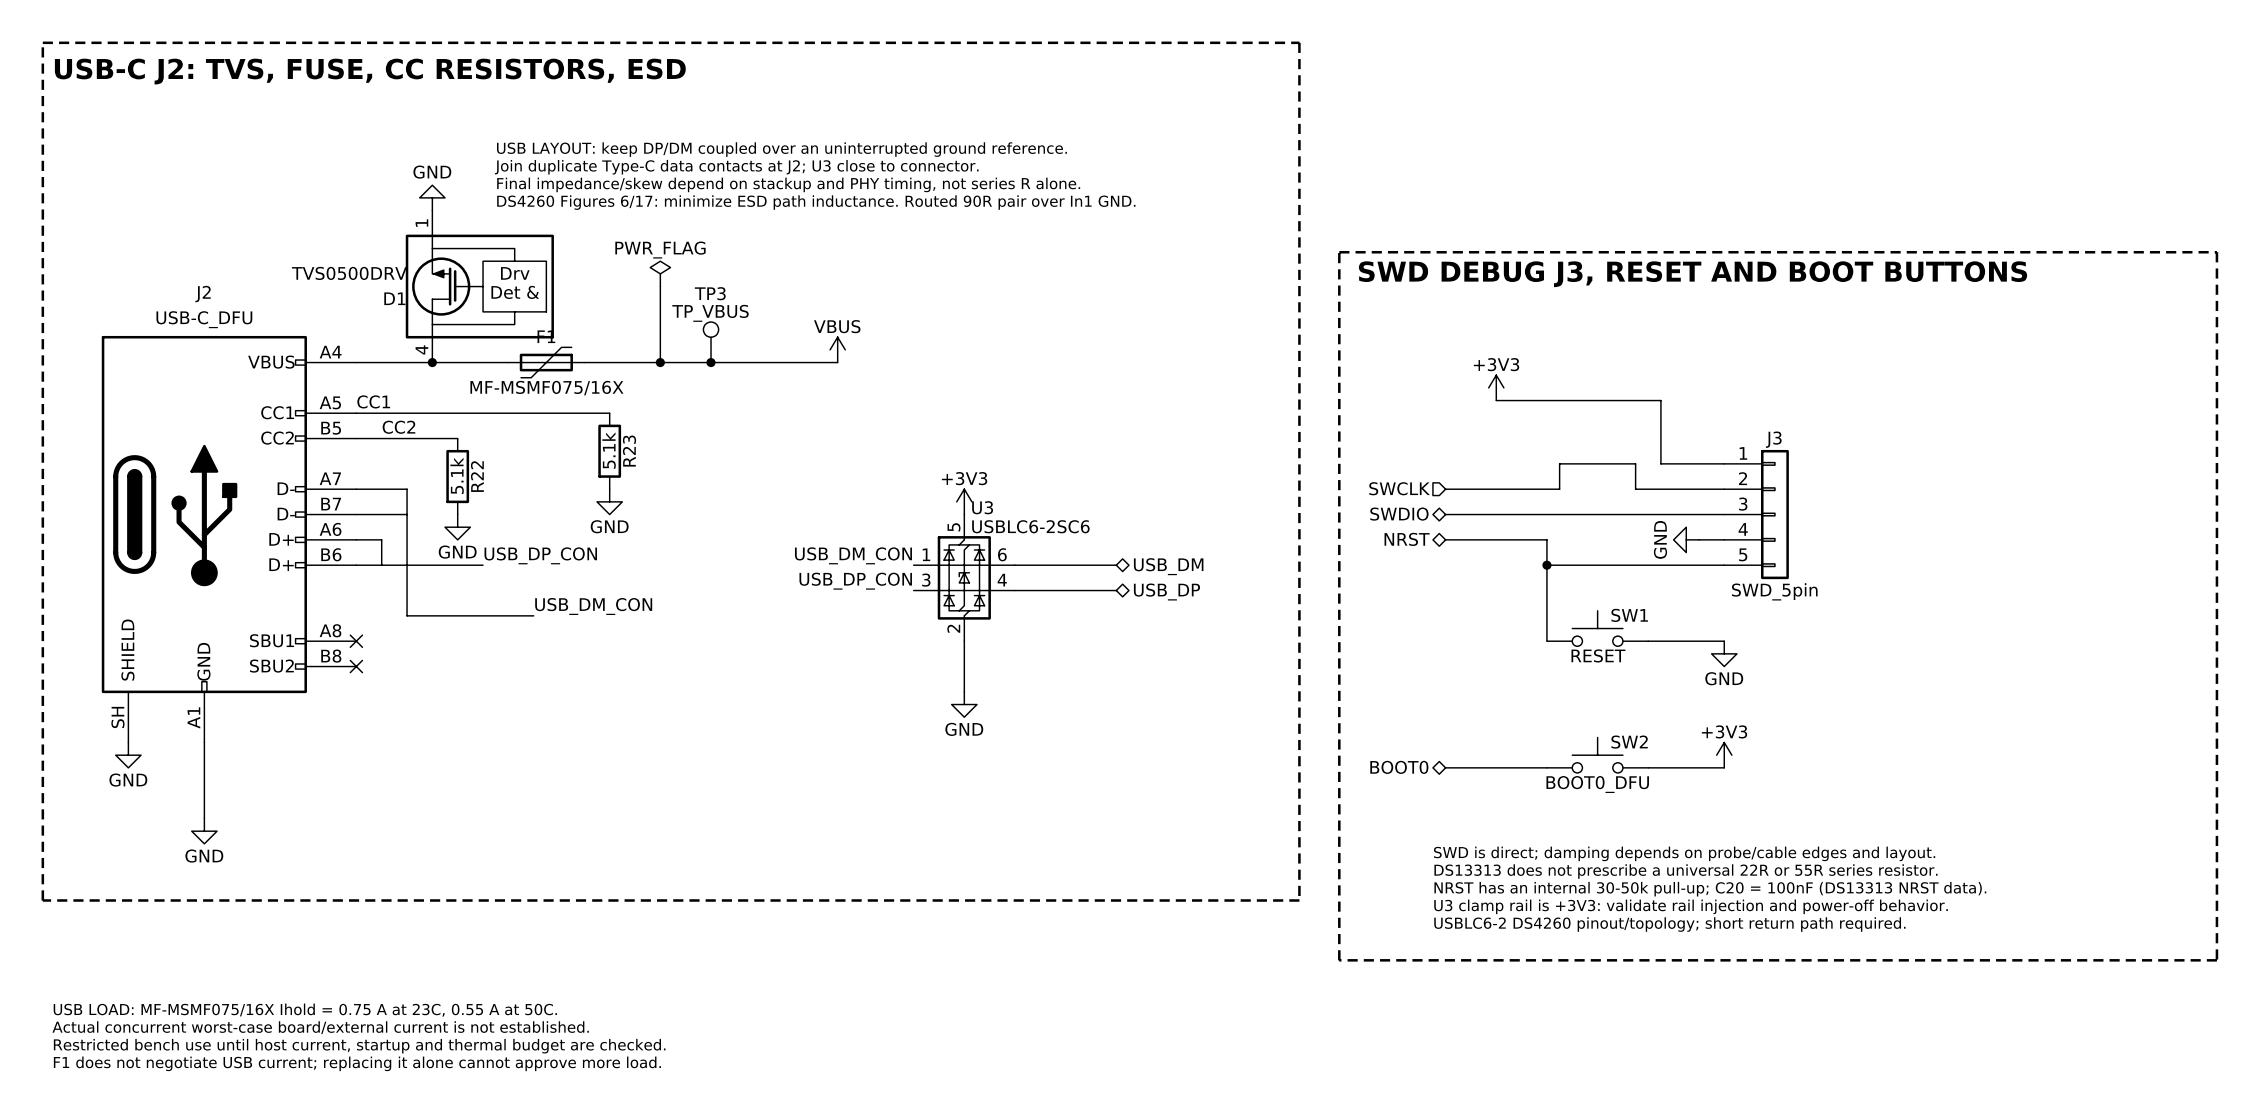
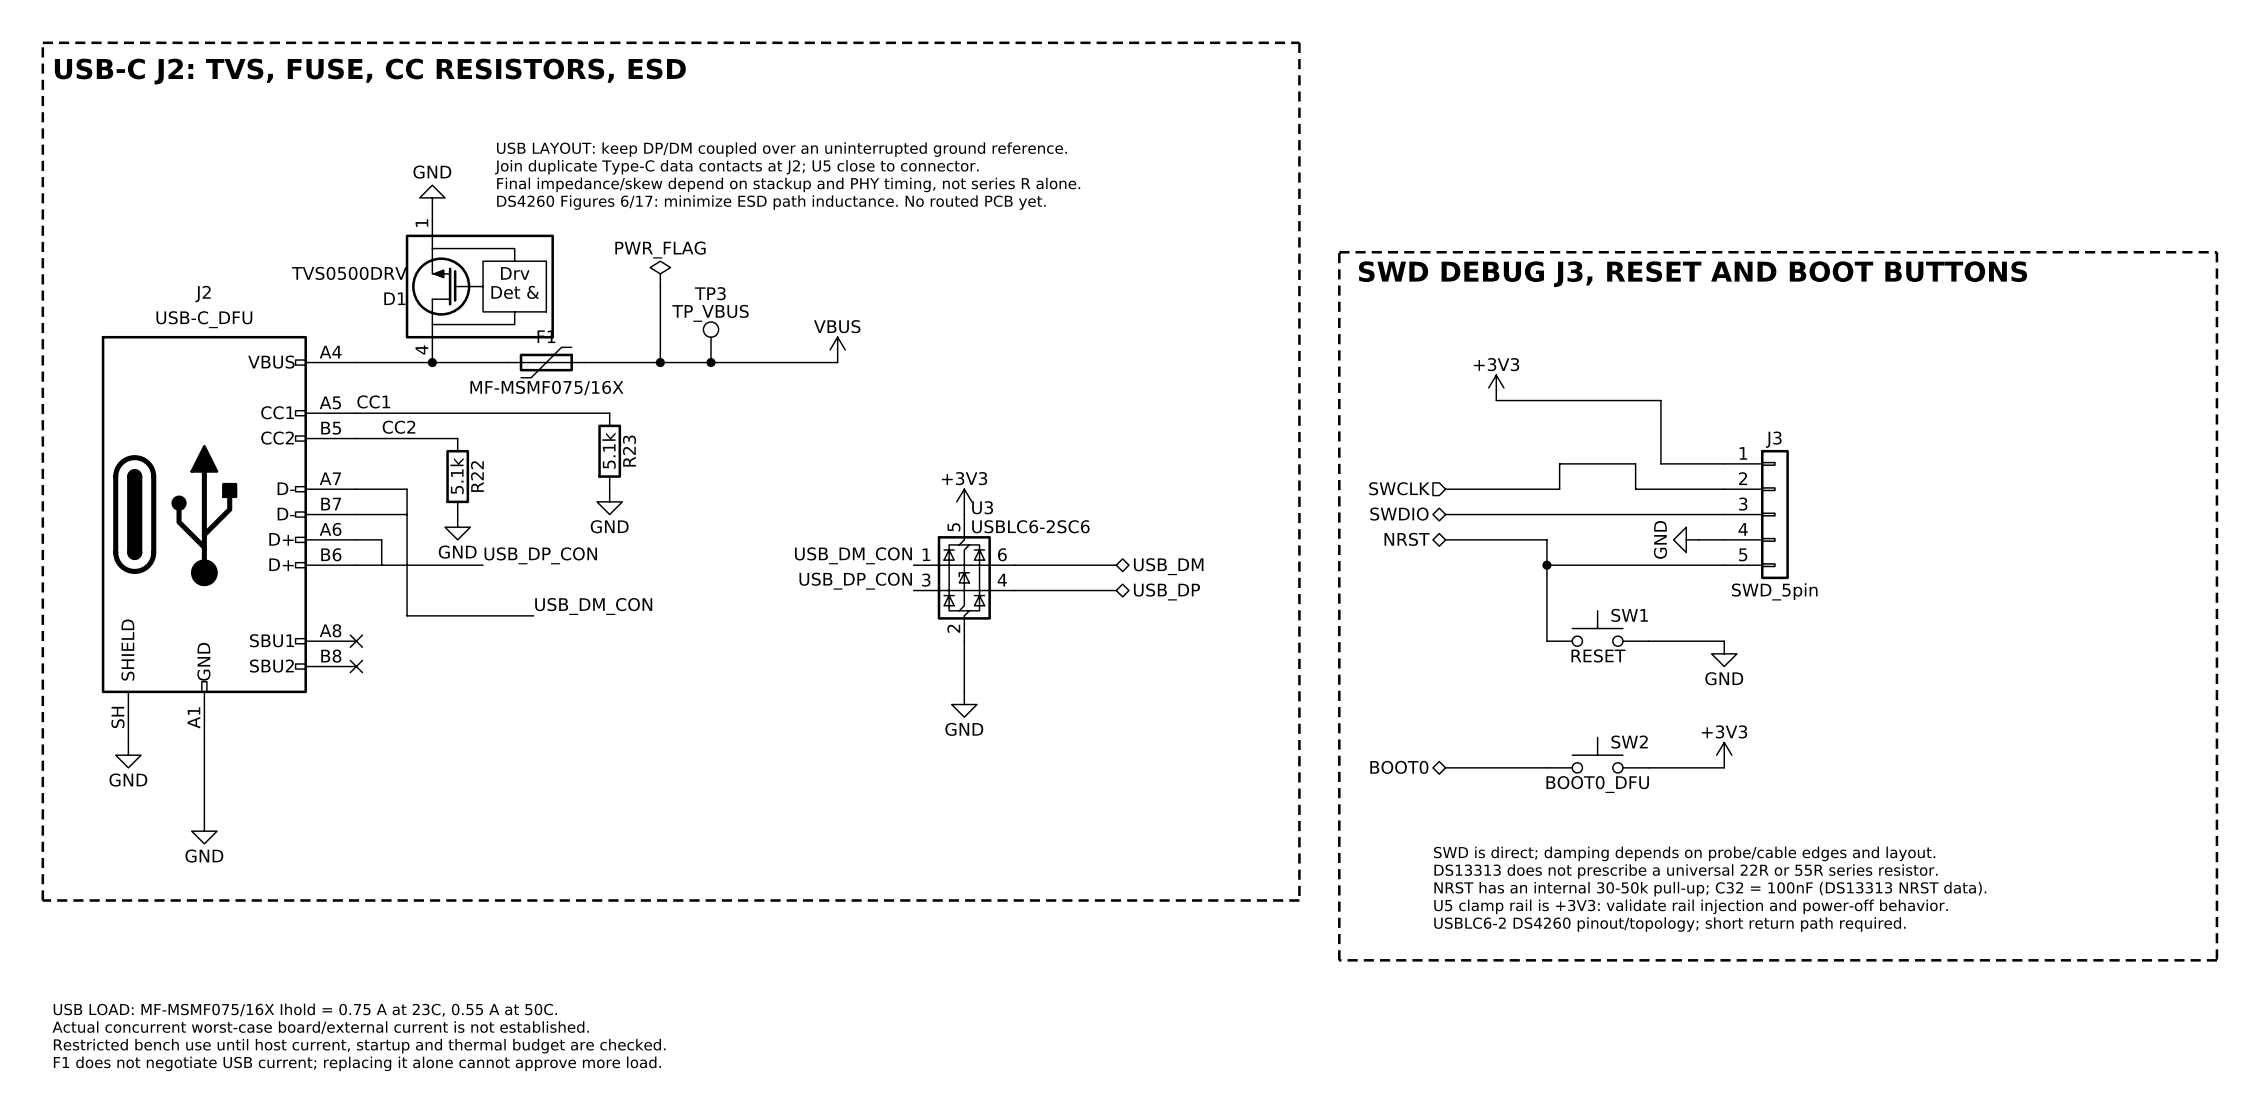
text: Join duplicate Type-C data contacts at J2; U3 close to connector. (736, 167) -> Join duplicate Type-C data contacts at J2; U5 close to connector. (736, 167)
text: DS4260 Figures 6/17: minimize ESD path inductance. Routed 90R pair over In1 GND. (816, 202) -> DS4260 Figures 6/17: minimize ESD path inductance. No routed PCB yet. (771, 202)
text: NRST has an internal 30-50k pull-up; C20 = 100nF (DS13313 NRST data). (1710, 889) -> NRST has an internal 30-50k pull-up; C32 = 100nF (DS13313 NRST data). (1710, 889)
text: U3 clamp rail is +3V3: validate rail injection and power-off behavior. (1691, 906) -> U5 clamp rail is +3V3: validate rail injection and power-off behavior. (1691, 906)

